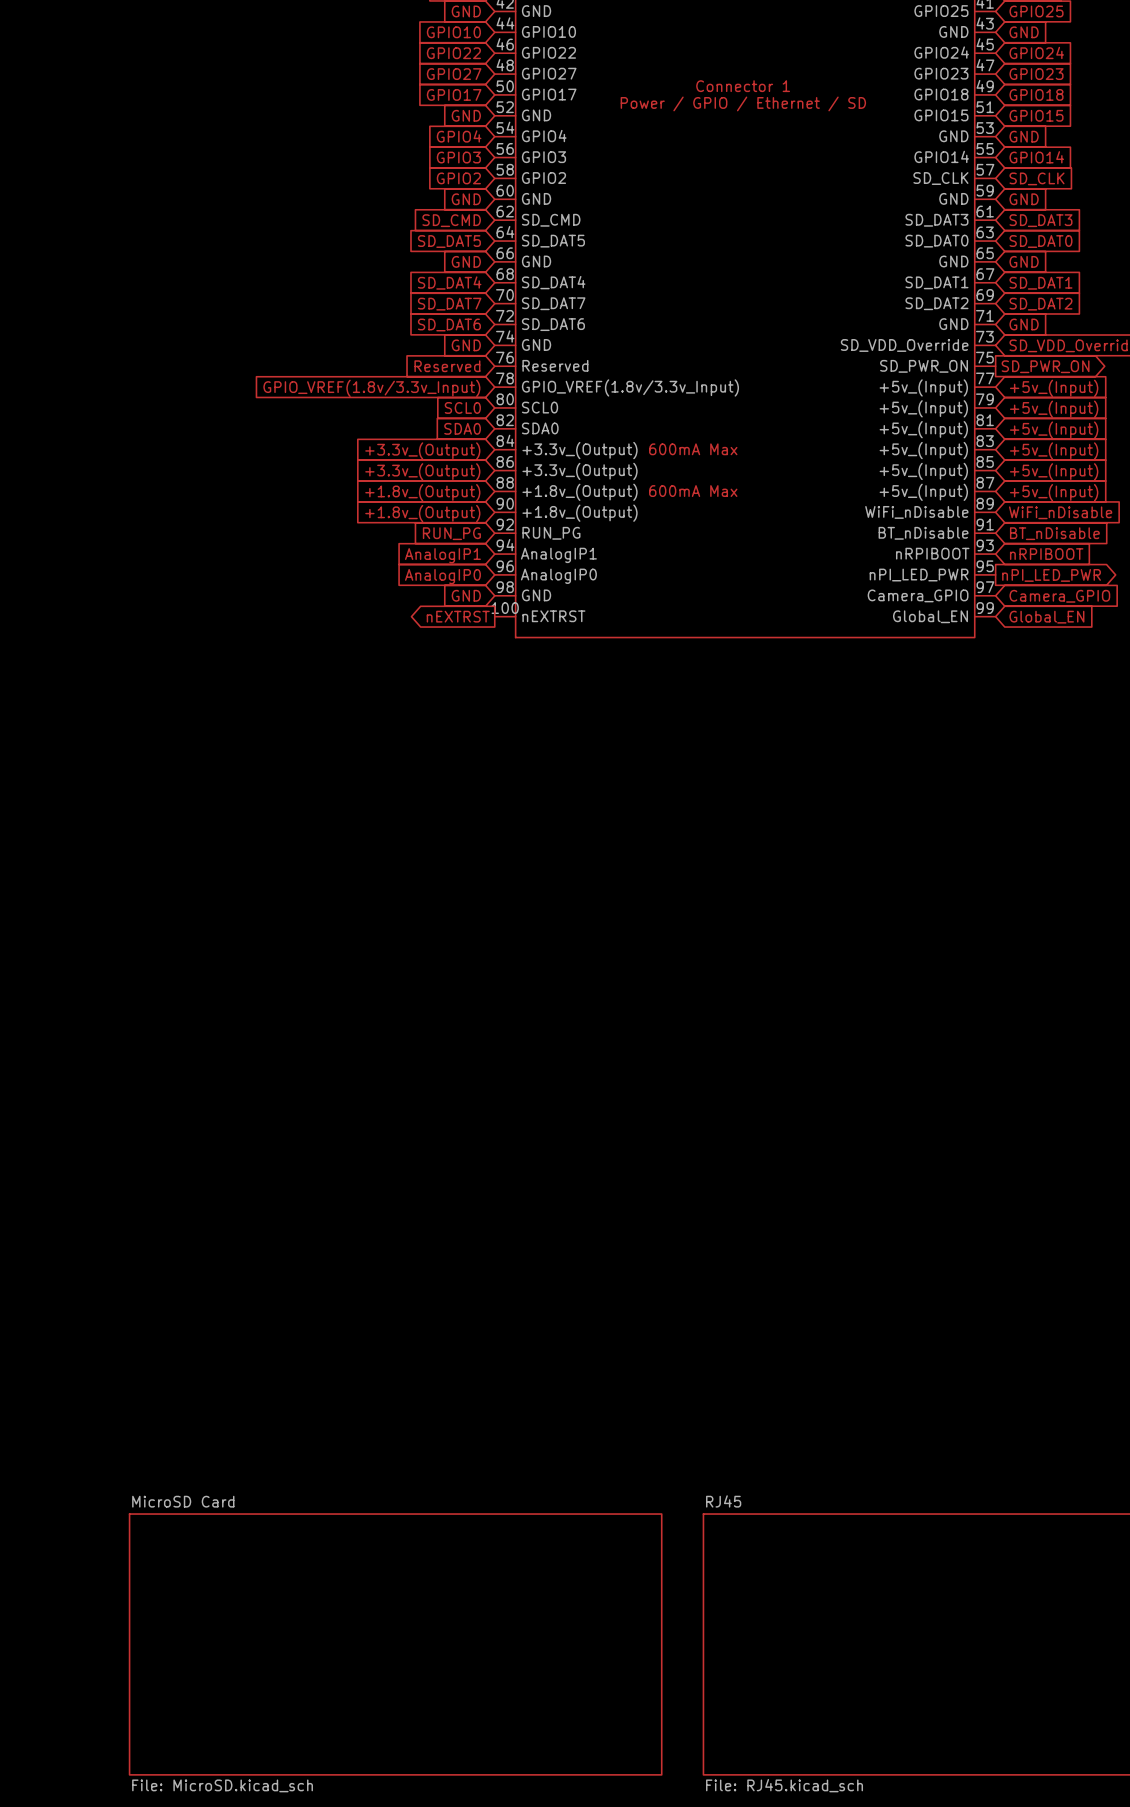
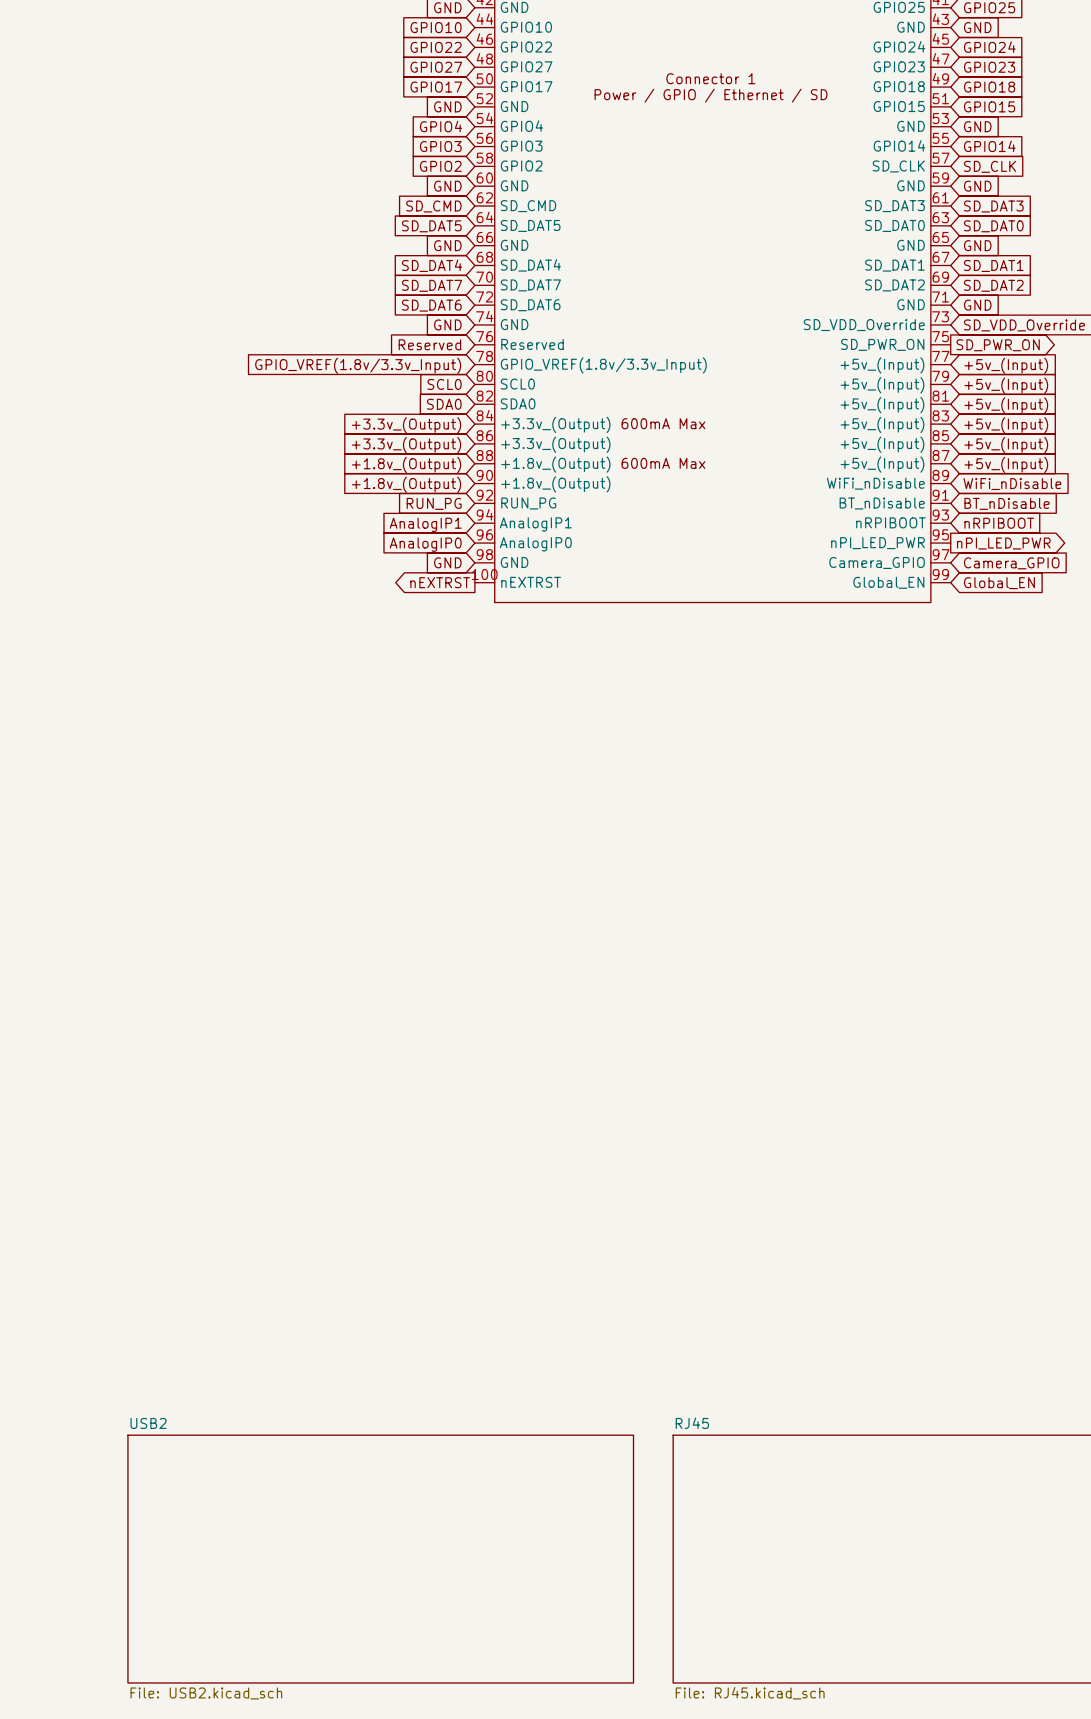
sheet MicroSD Card name: MicroSD Card (183, 1501) -> USB2 (148, 1423)
sheet MicroSD Card value: File: MicroSD.kicad_sch (222, 1785) -> File: USB2.kicad_sch (206, 1693)

